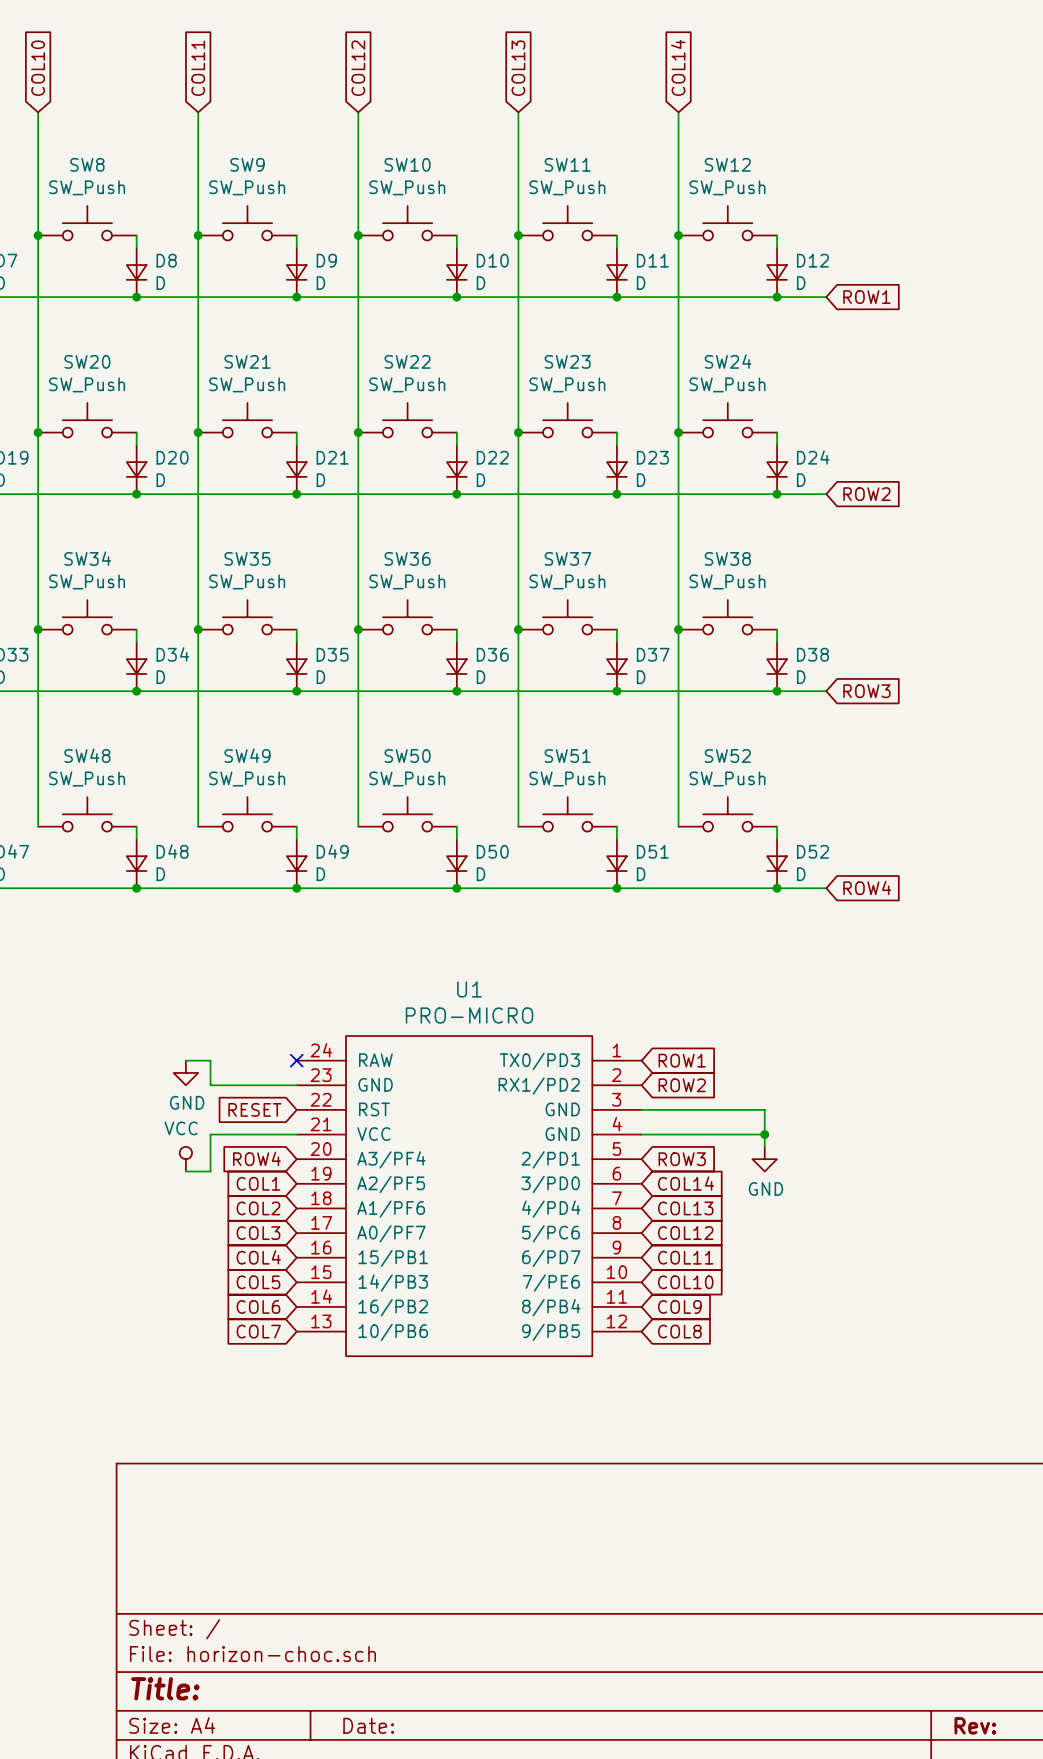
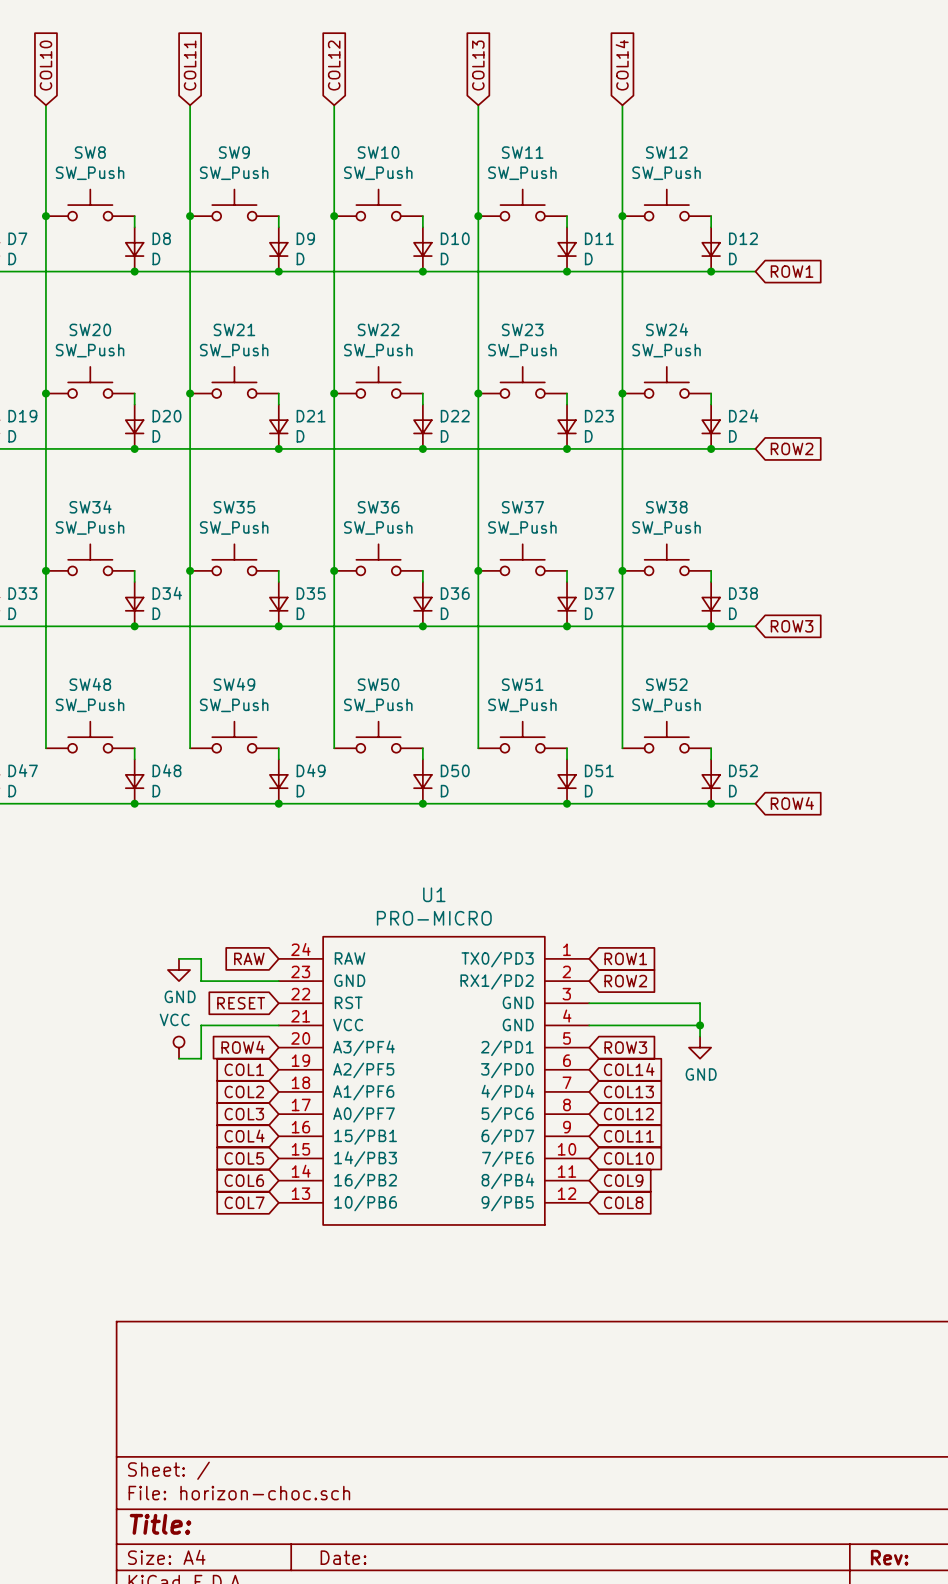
global label: none -> RAW (249, 958)
no-connect mark: (296, 1060) -> none

